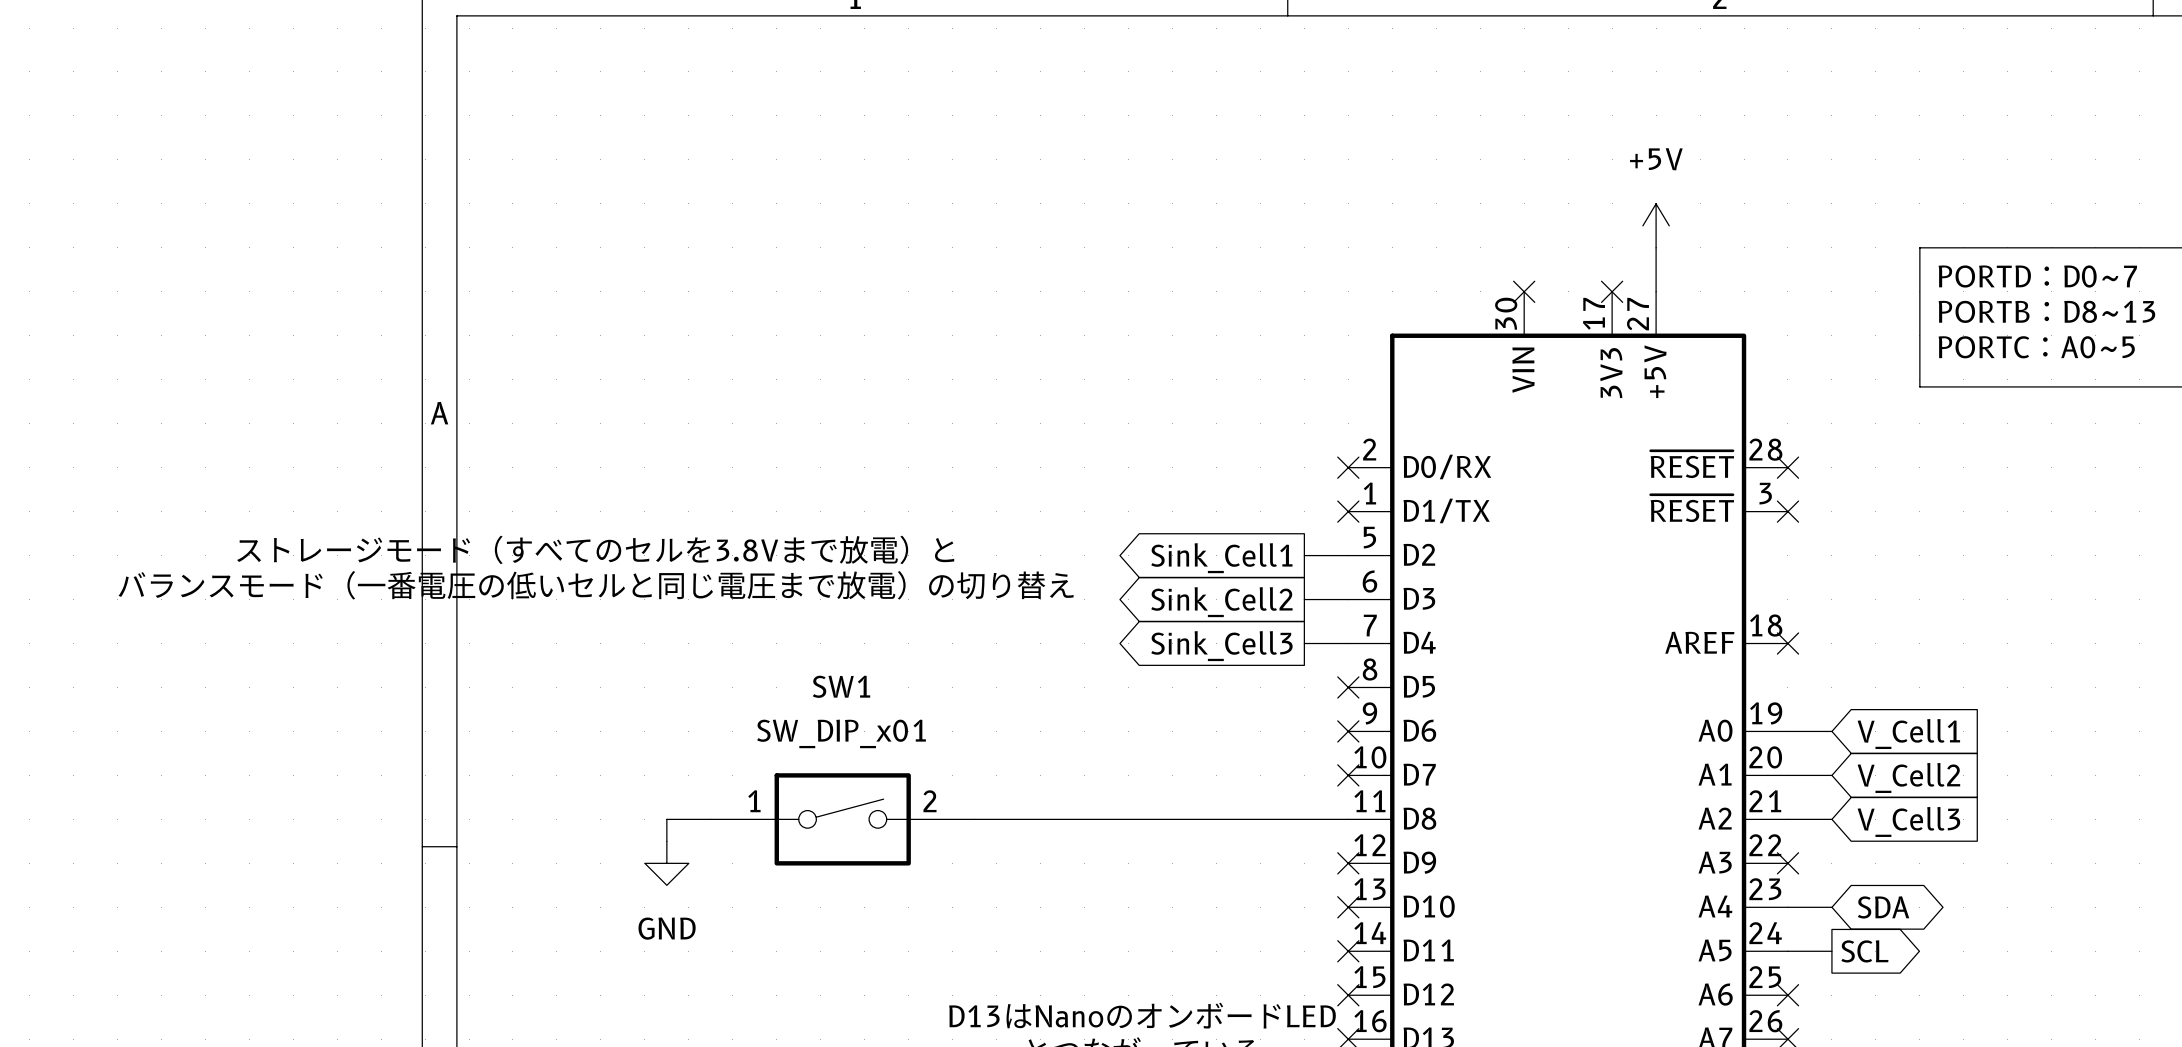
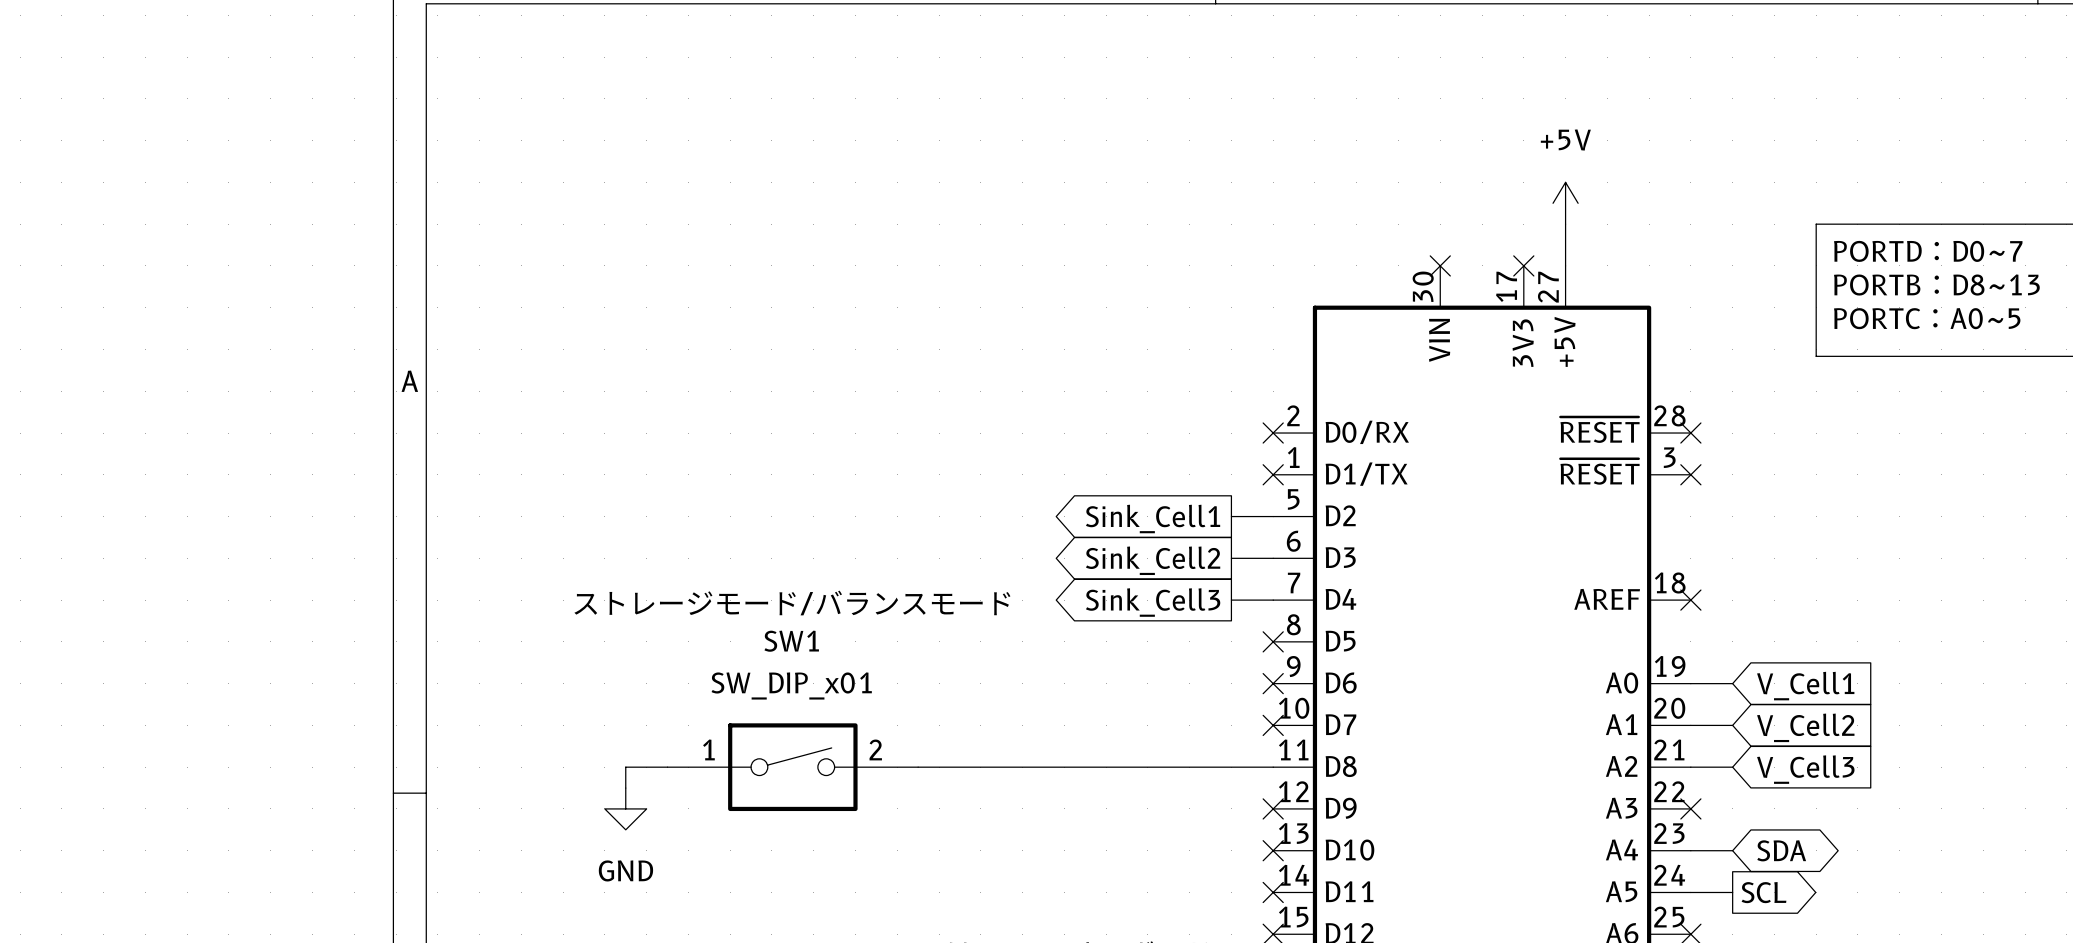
text: ストレージモード（すべてのセルを3.8Vまで放電）と (595, 549) -> none
text: バランスモード（一番電圧の低いセルと同じ電圧まで放電）の切り替え (596, 585) -> none
text: none -> ストレージモード/バランスモード (792, 603)

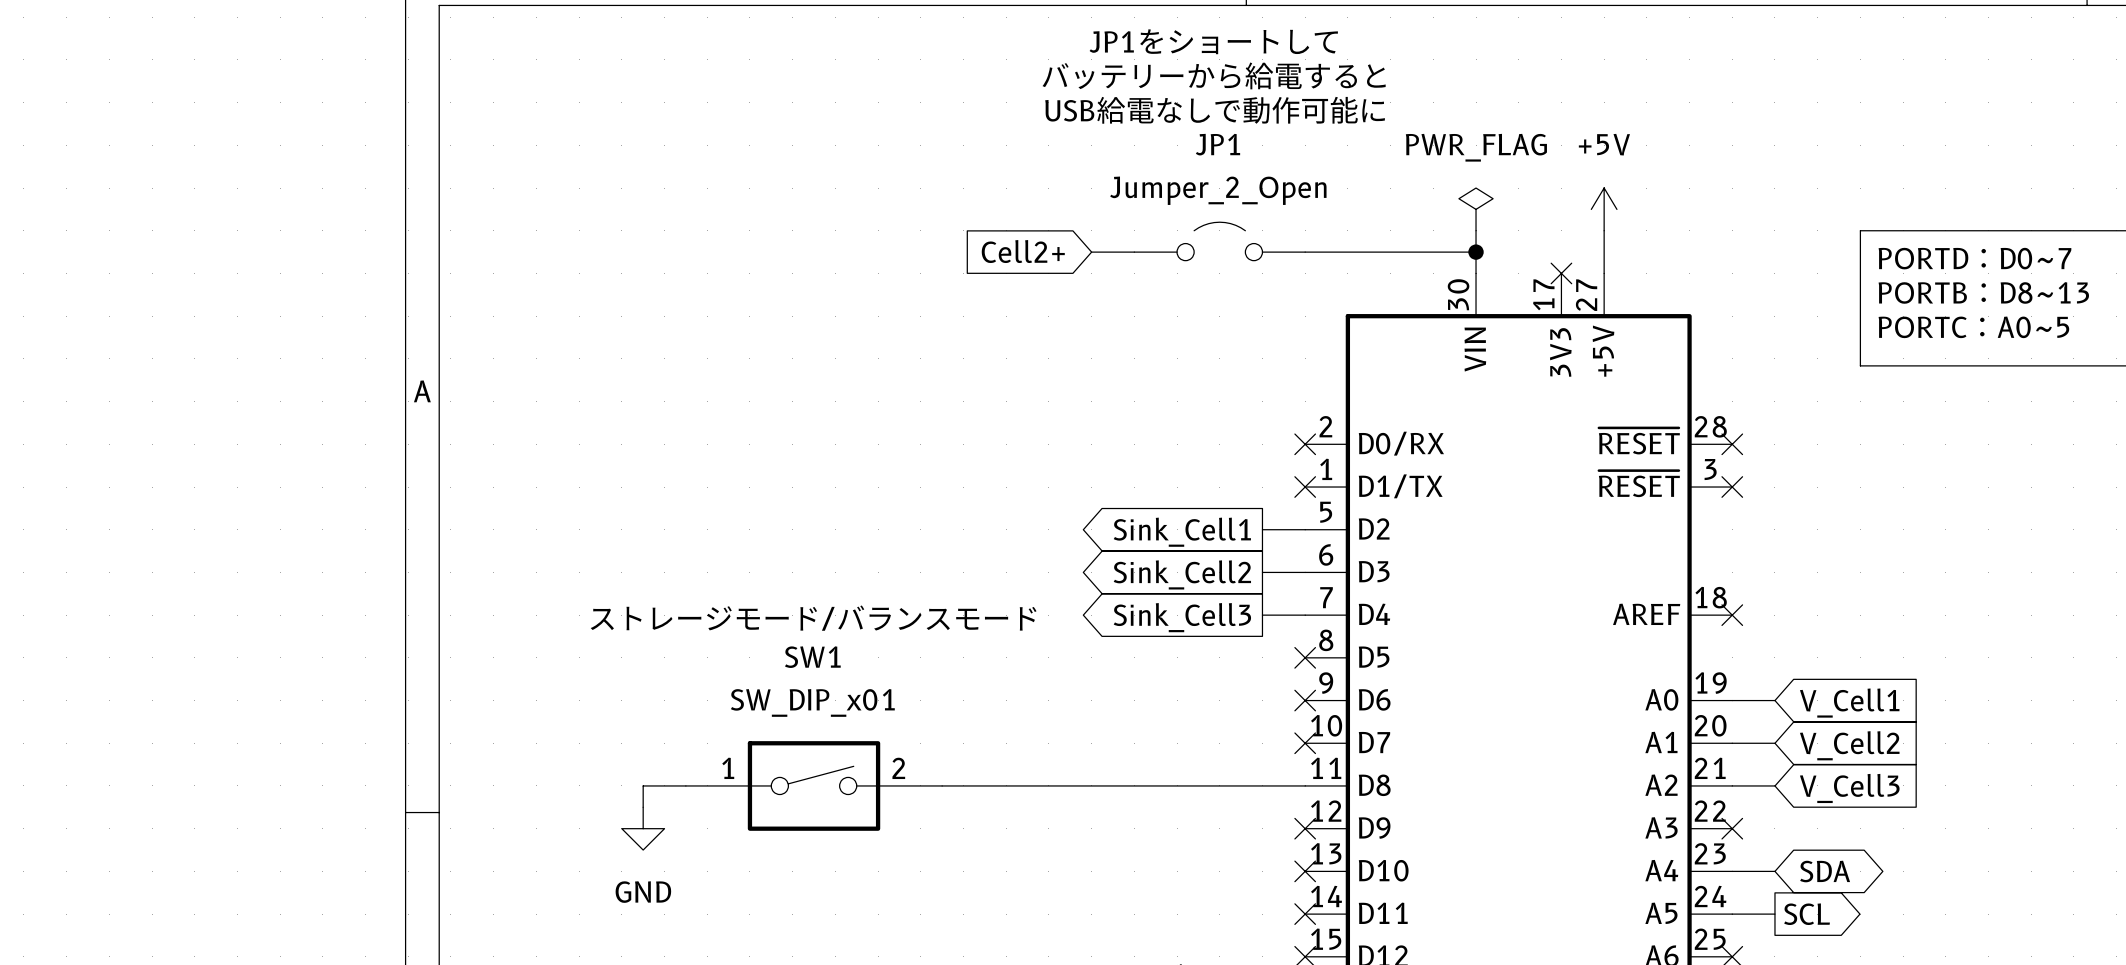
text: none -> JP1をショートして (1213, 41)
text: none -> バッテリーから給電すると (1214, 75)
text: none -> USB給電なしで動作可能に (1215, 110)
power symbol: none -> PWR_FLAG (1476, 209)
wire: none -> (1476, 230) (1476, 273)
JP1: none -> Jumper_2_Open (1219, 241)
global label: none -> Cell2+ (1023, 251)
wire: none -> (1091, 252) (1134, 252)
wire: none -> (1305, 252) (1476, 252)
junction: none -> (1476, 252)
no-connect mark: (1440, 265) -> none

